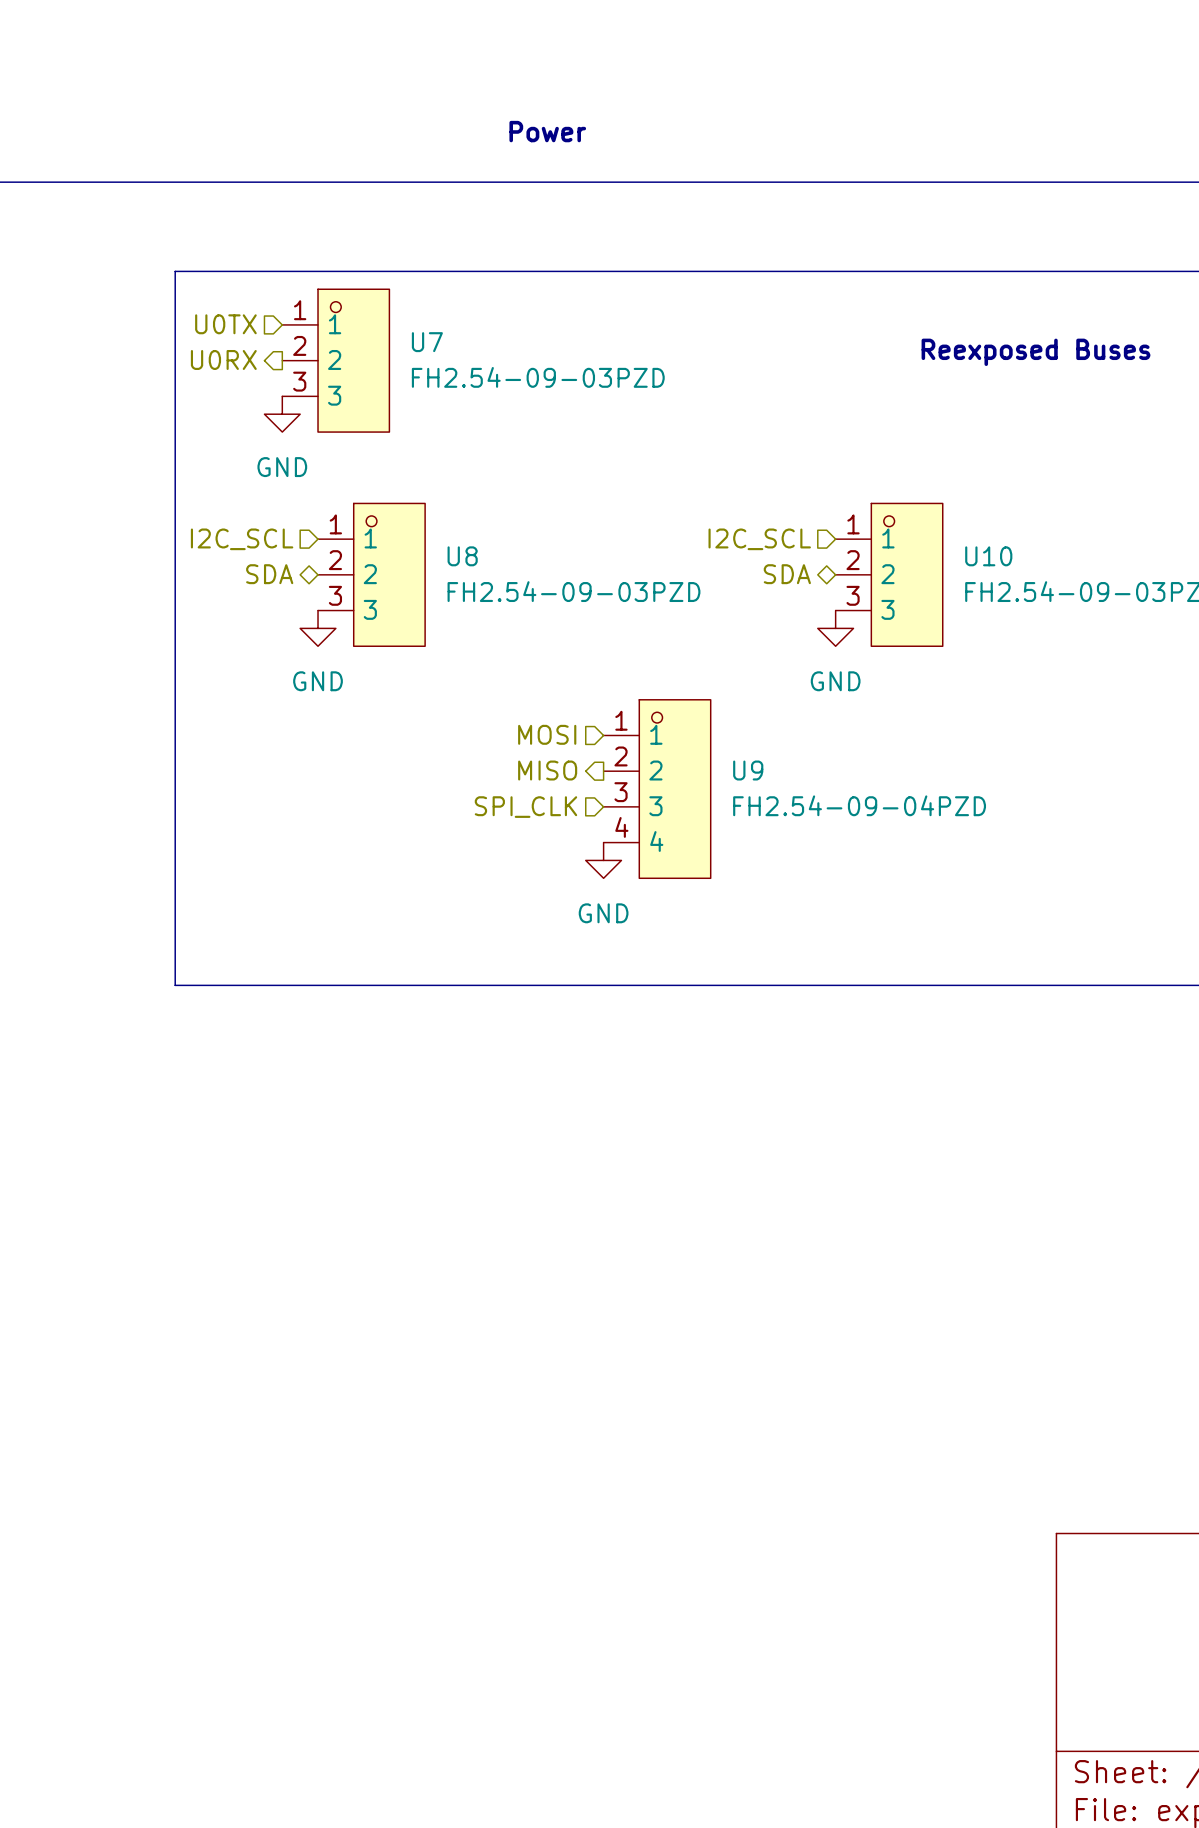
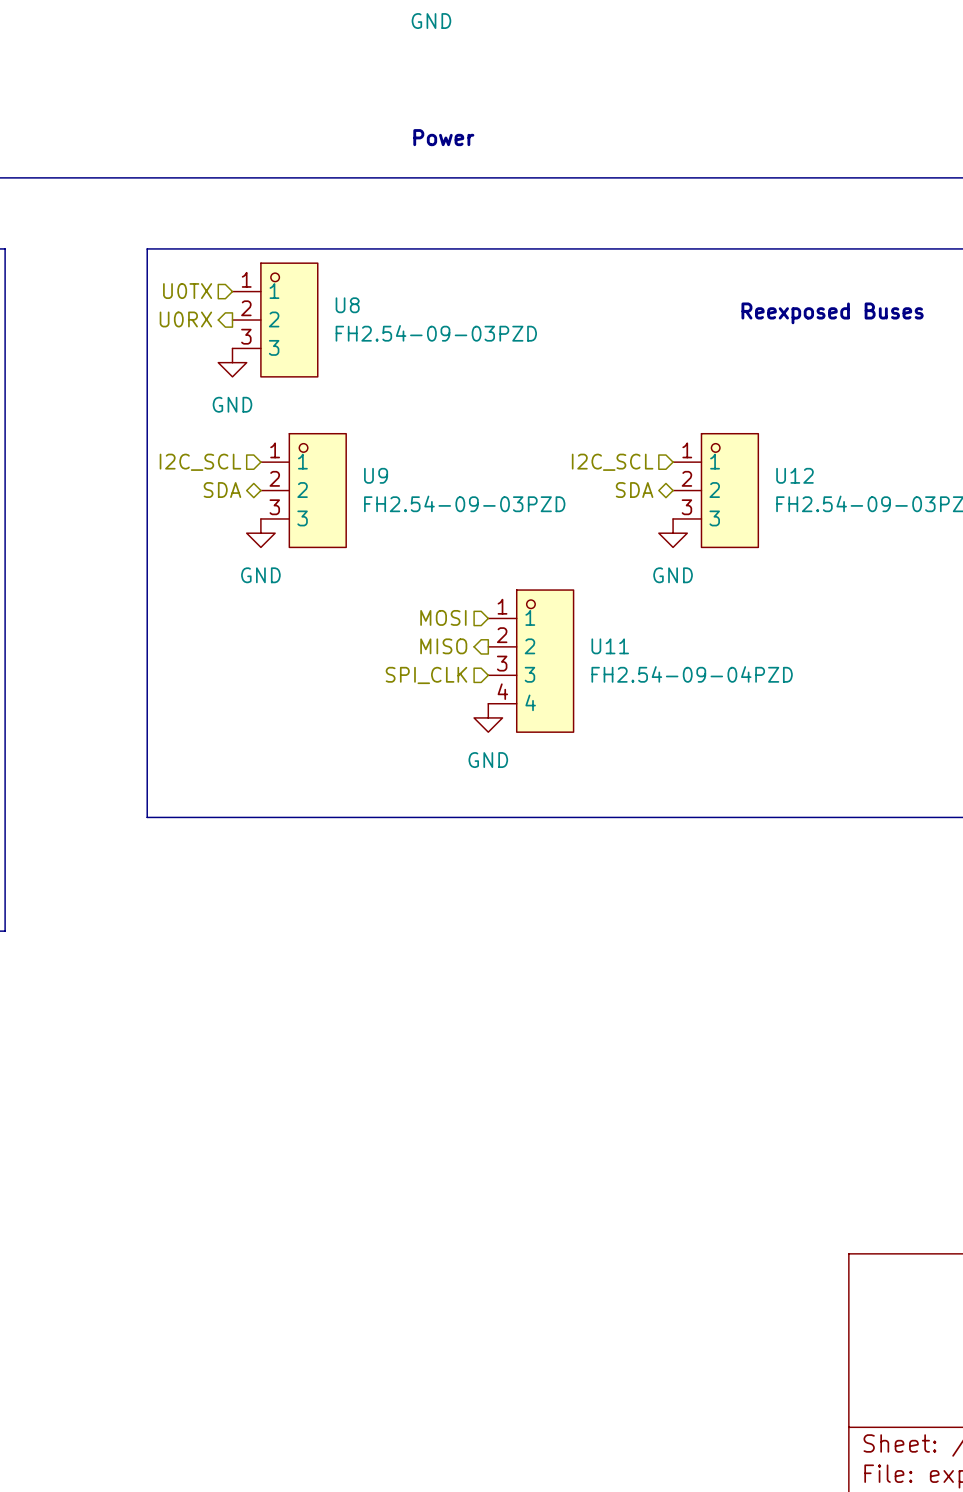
U7 name: U7 (427, 342) -> U8 (347, 305)
U8 name: U8 (462, 556) -> U9 (376, 475)
U10 name: U10 (988, 556) -> U12 (794, 475)
U9 name: U9 (748, 770) -> U11 (610, 646)

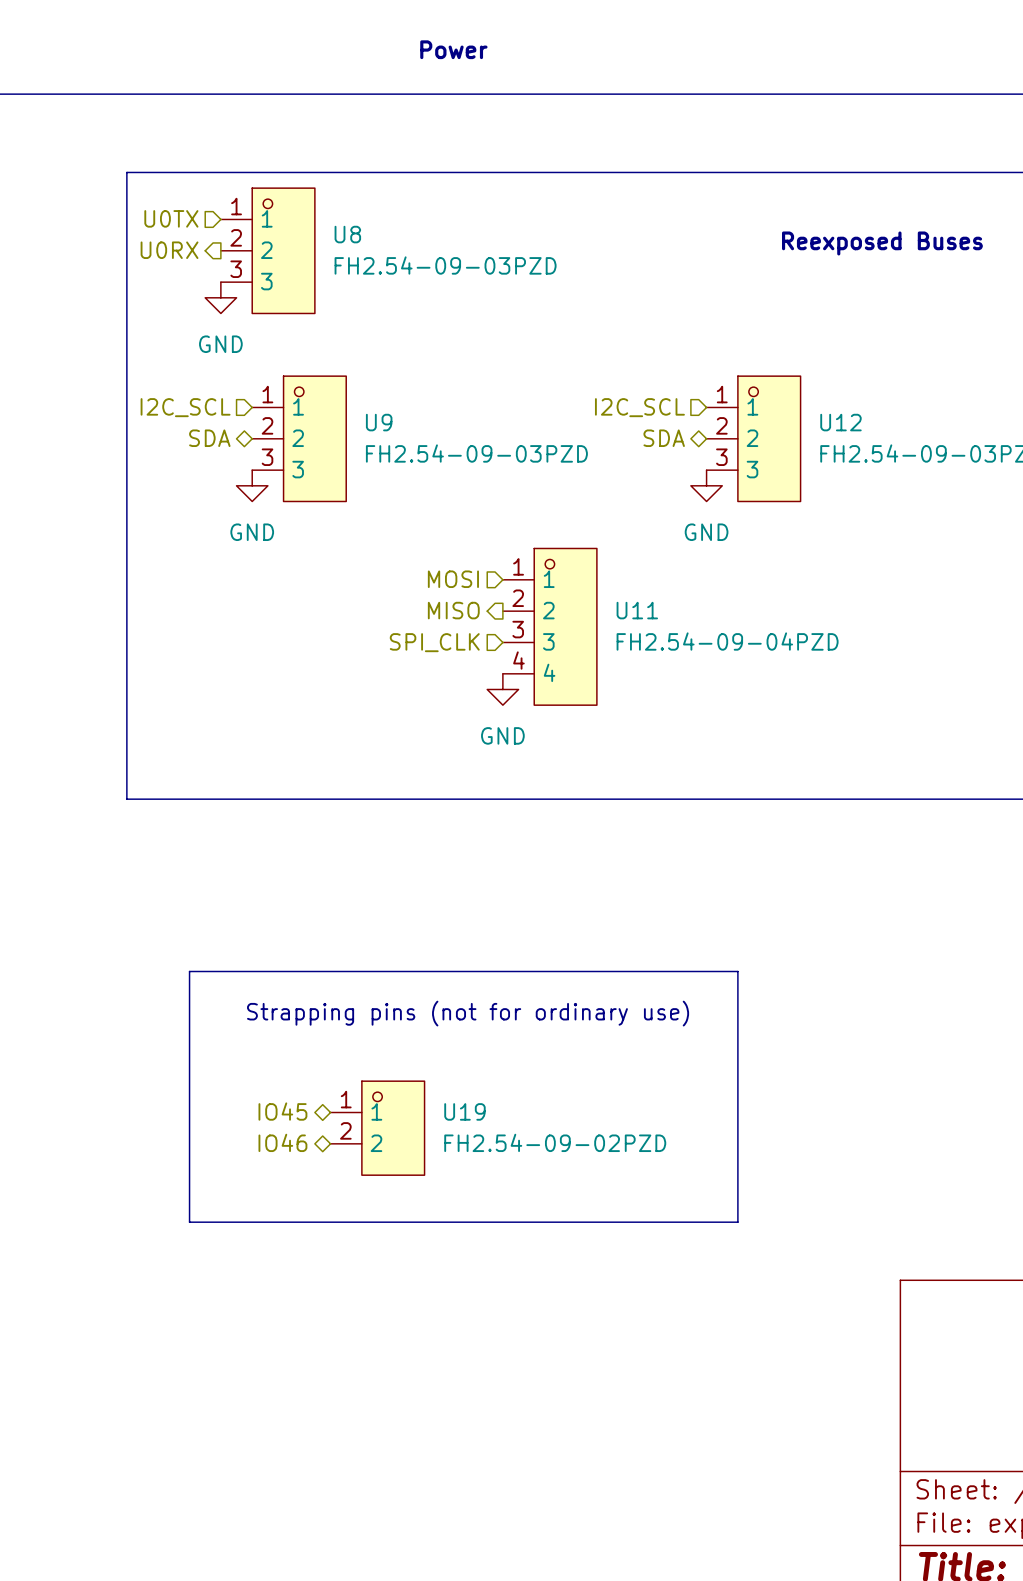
line: none -> (189, 971) (737, 971) (737, 1222) (189, 1222) (189, 971)
text: none -> Strapping pins (not for ordinary use) (468, 1013)
hierarchical label: none -> IO45 (282, 1111)
U19: none -> FH2.54-09-02PZD (377, 1128)
hierarchical label: none -> IO46 (282, 1142)

